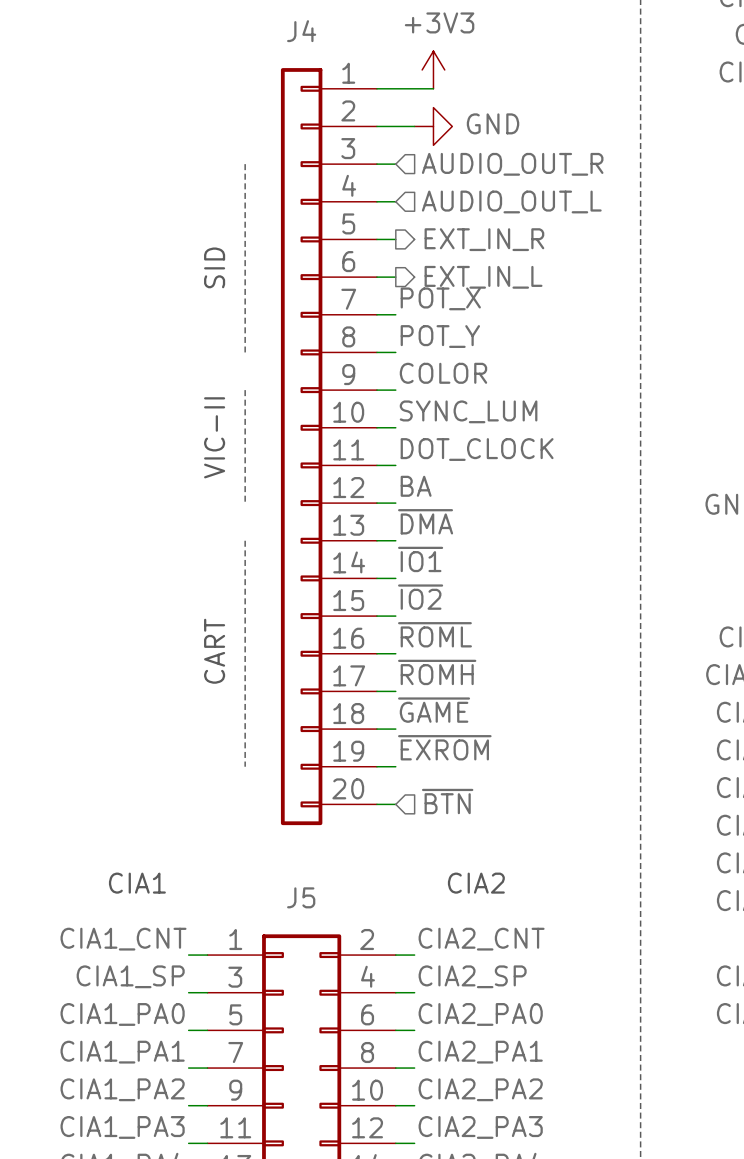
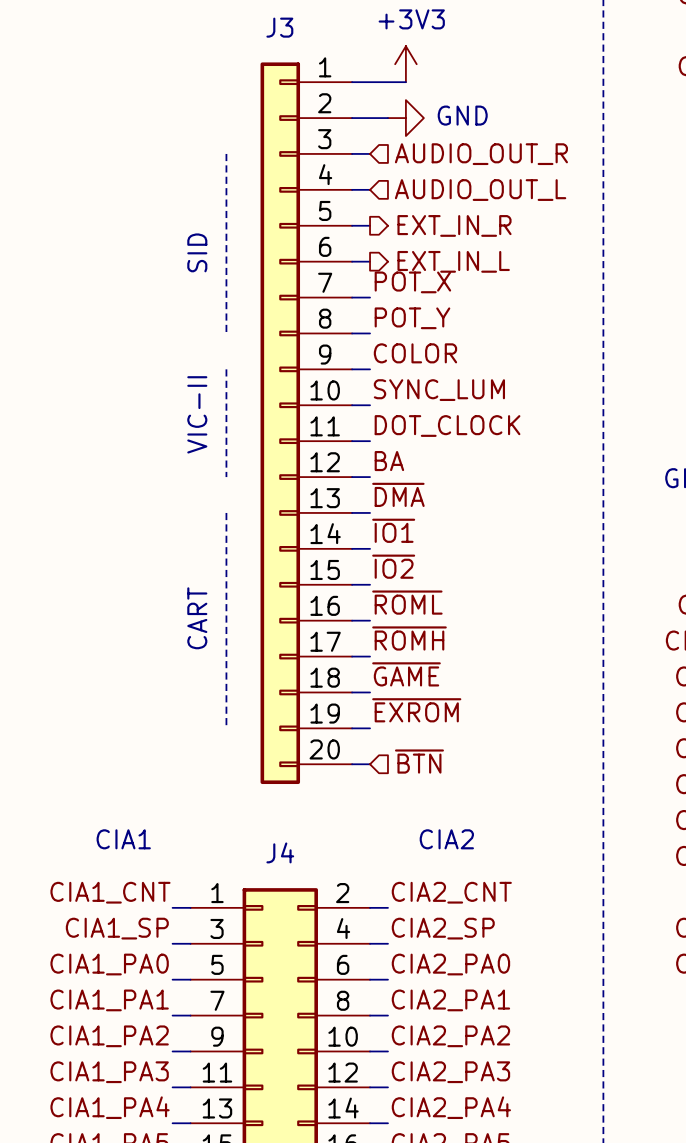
J4 name: J4 (301, 31) -> J3 (279, 27)
J5 name: J5 (301, 897) -> J4 (280, 852)

